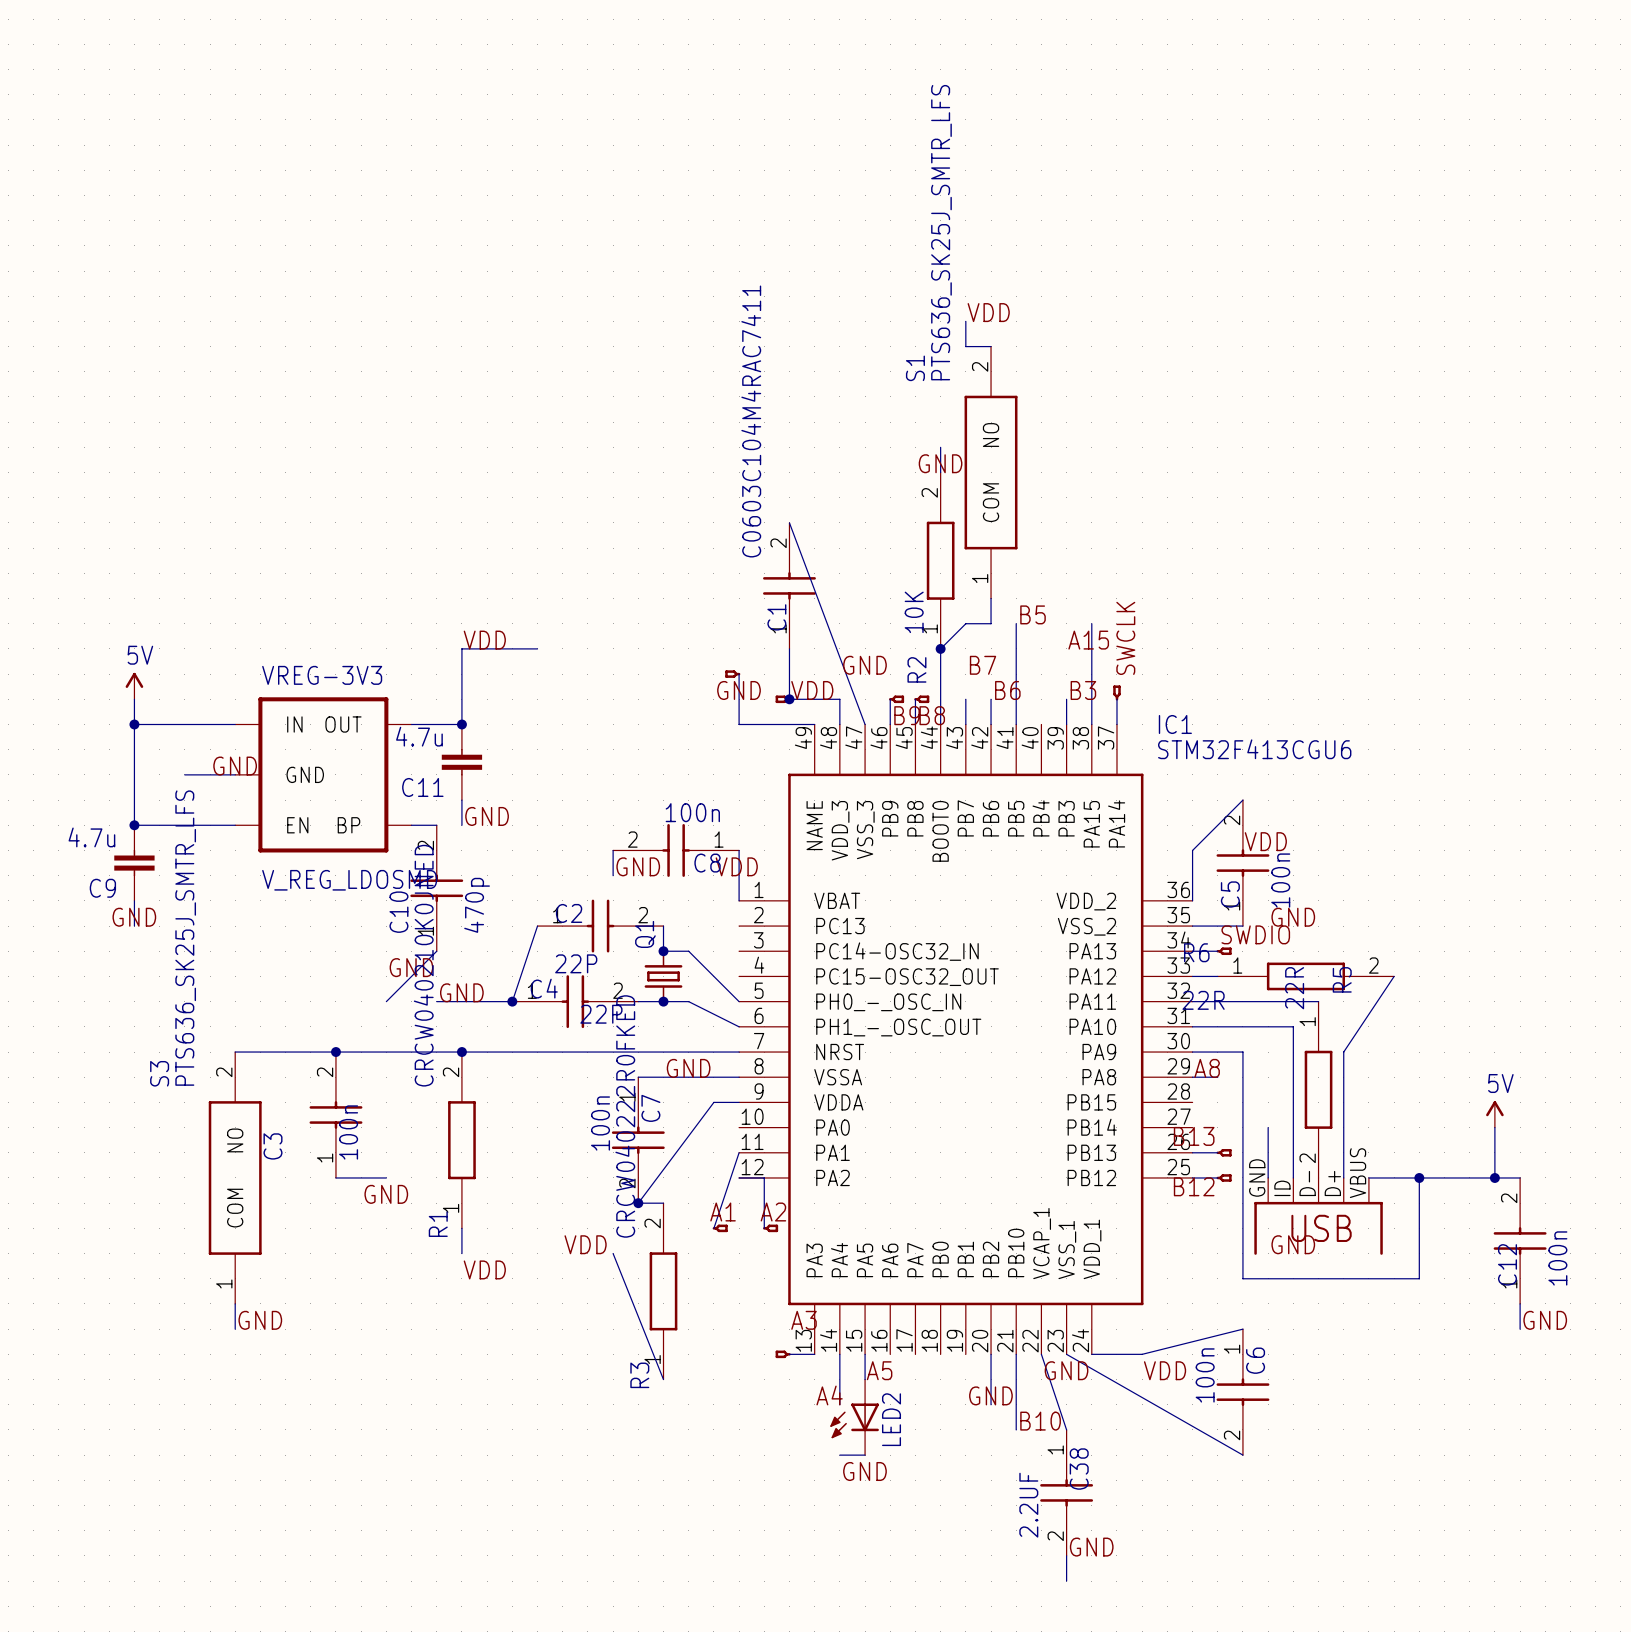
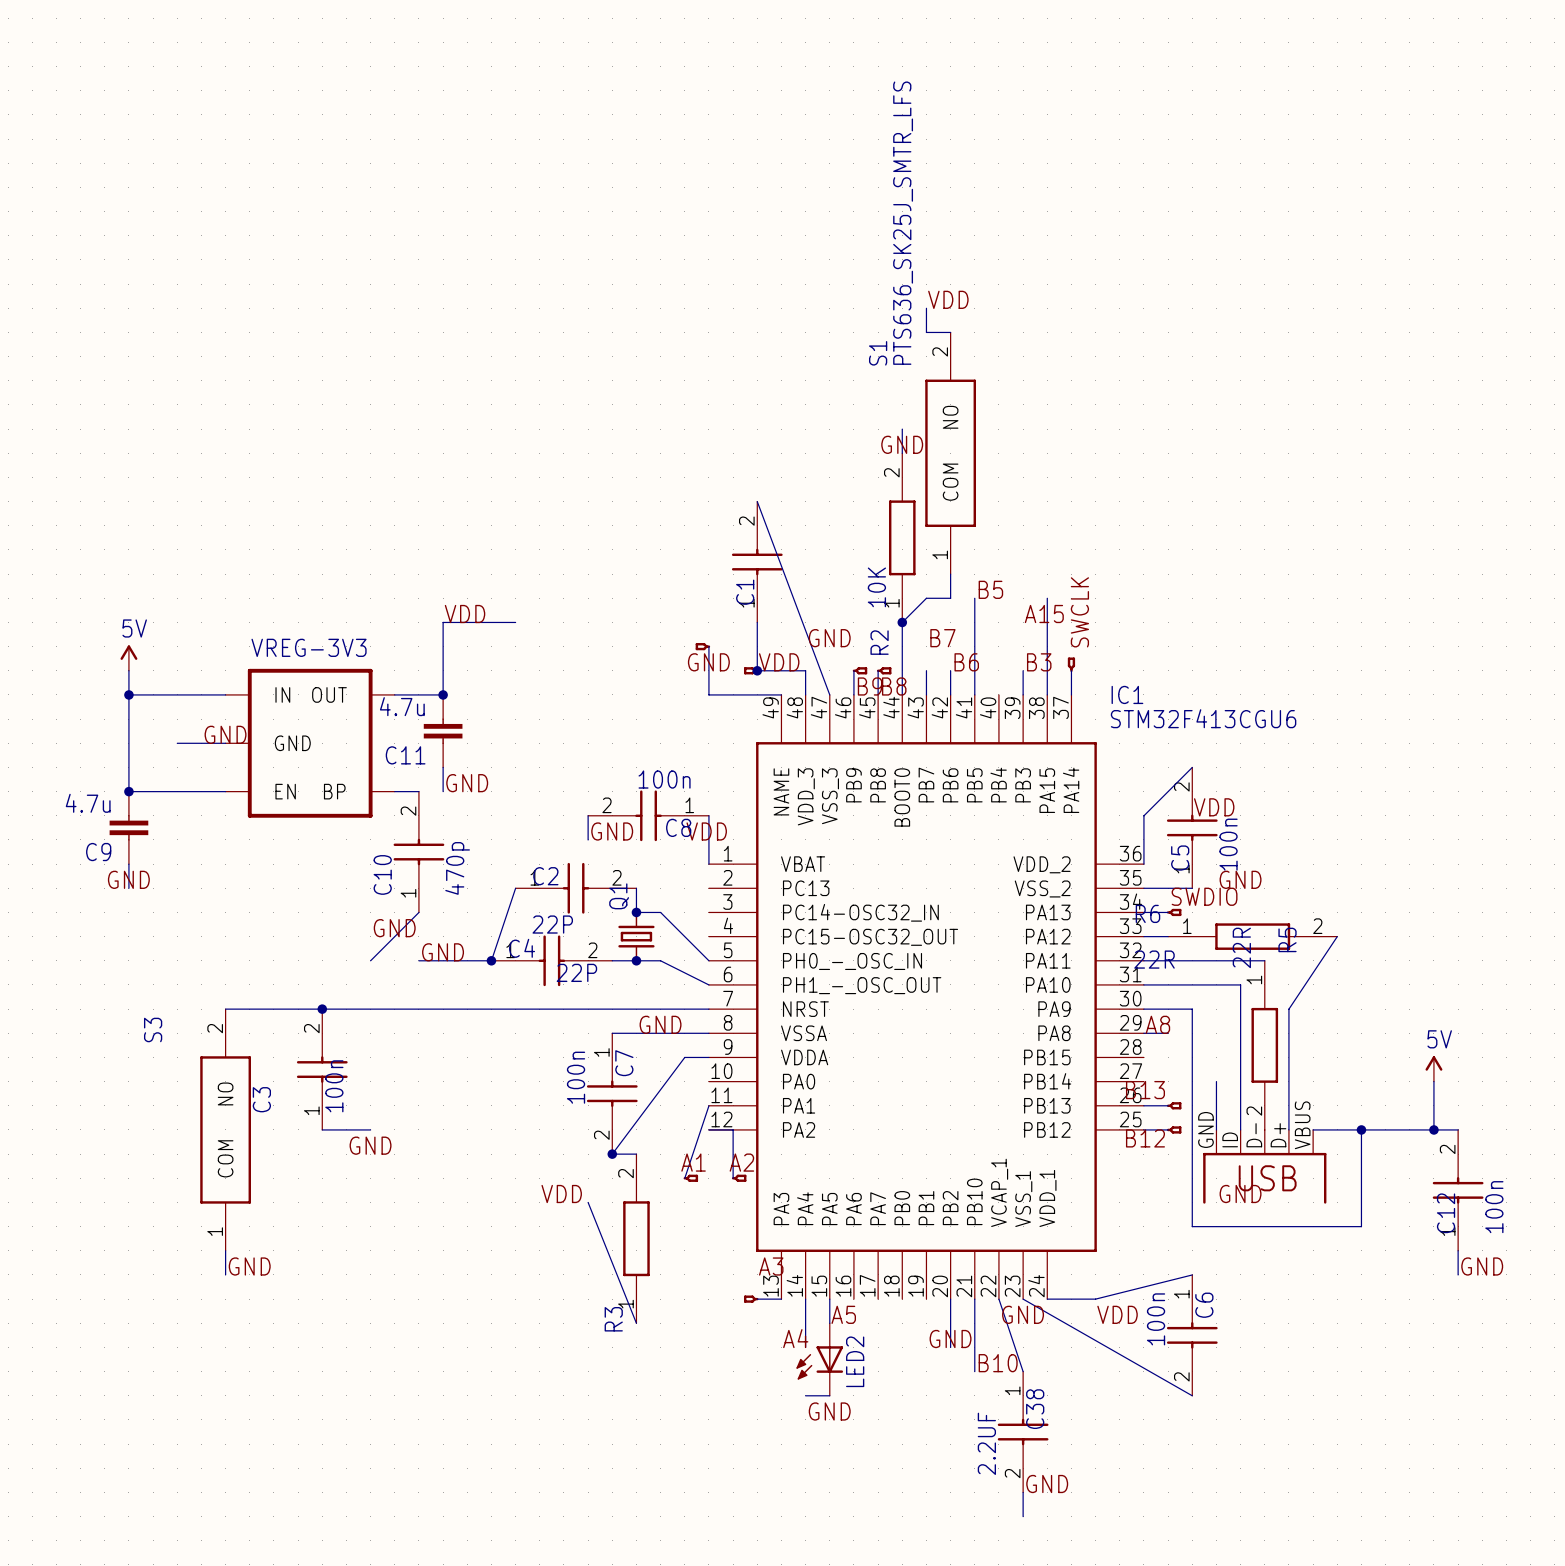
C1 value: C0603C104M4RAC7411 (751, 421) -> none
VREG-3V3 value: V_REG_LDOSMD (349, 880) -> none
S3 value: PTS636_SK25J_SMTR_LFS (185, 938) -> none
junction: (461, 1052) -> none
R3 value: CRCW040222R0FKED (625, 1116) -> none
R1: CRCW040210K0JNED (461, 1140) -> none
wire: (461, 1228) (461, 1253) -> none
label: VDD (484, 1269) -> none

